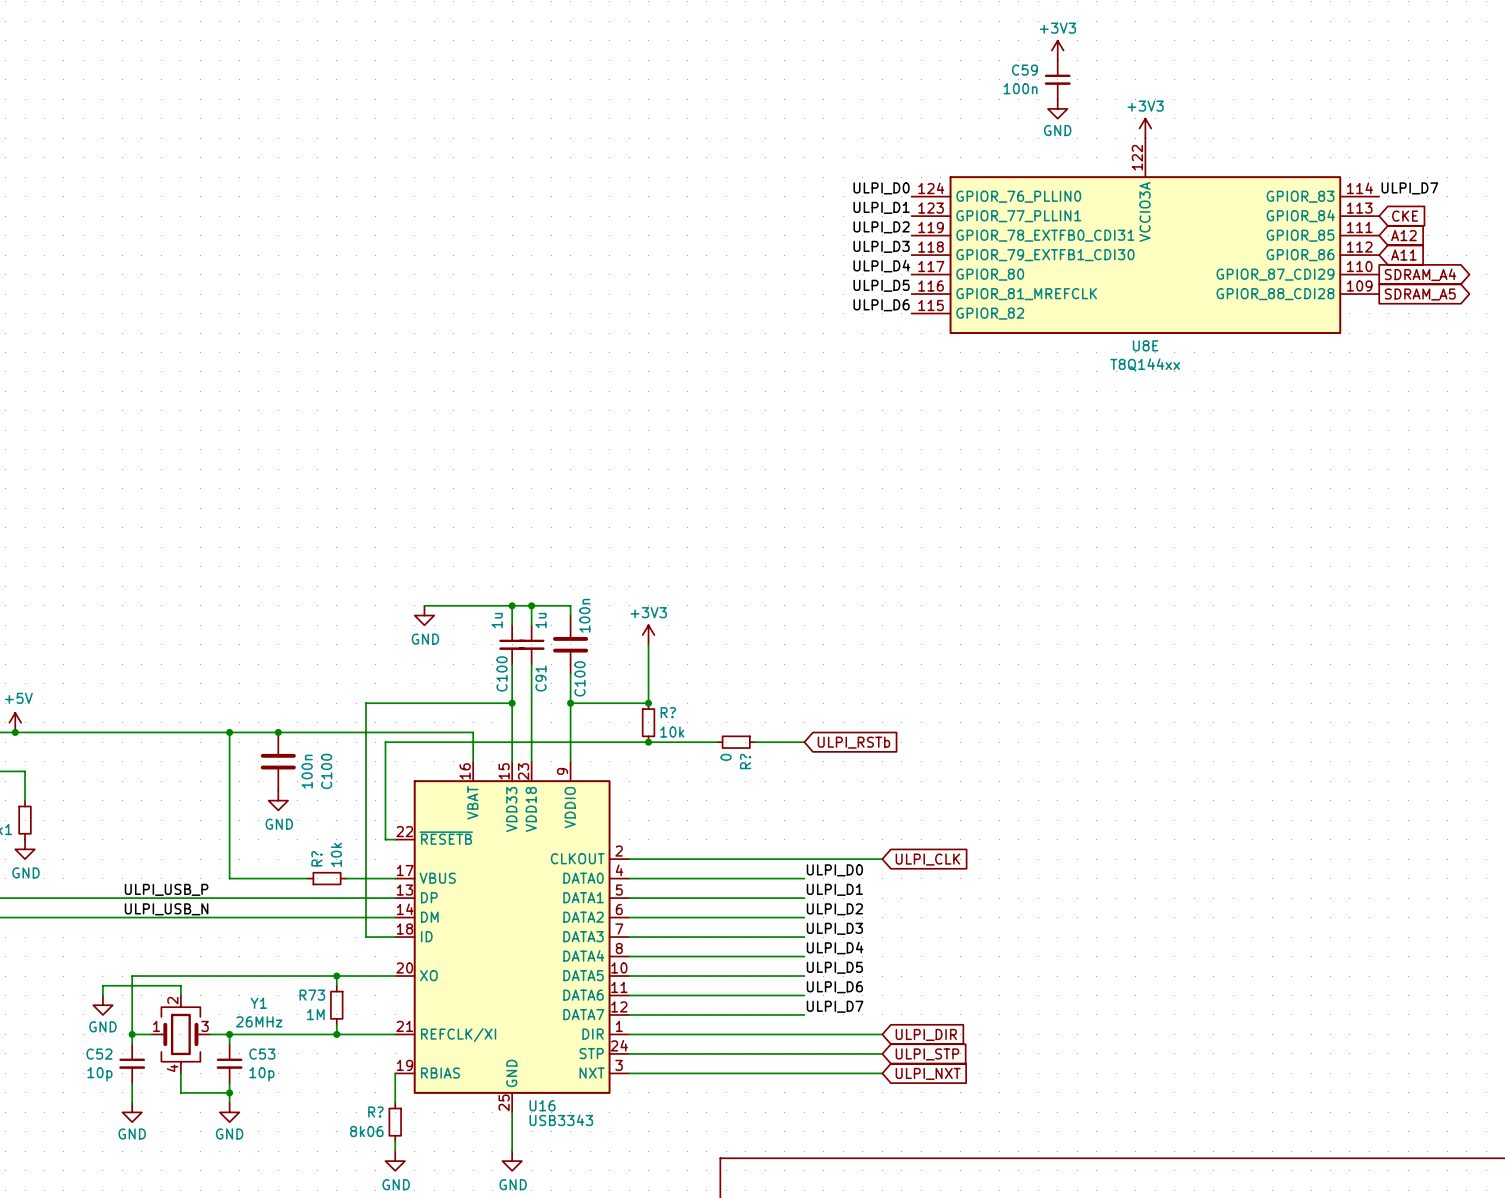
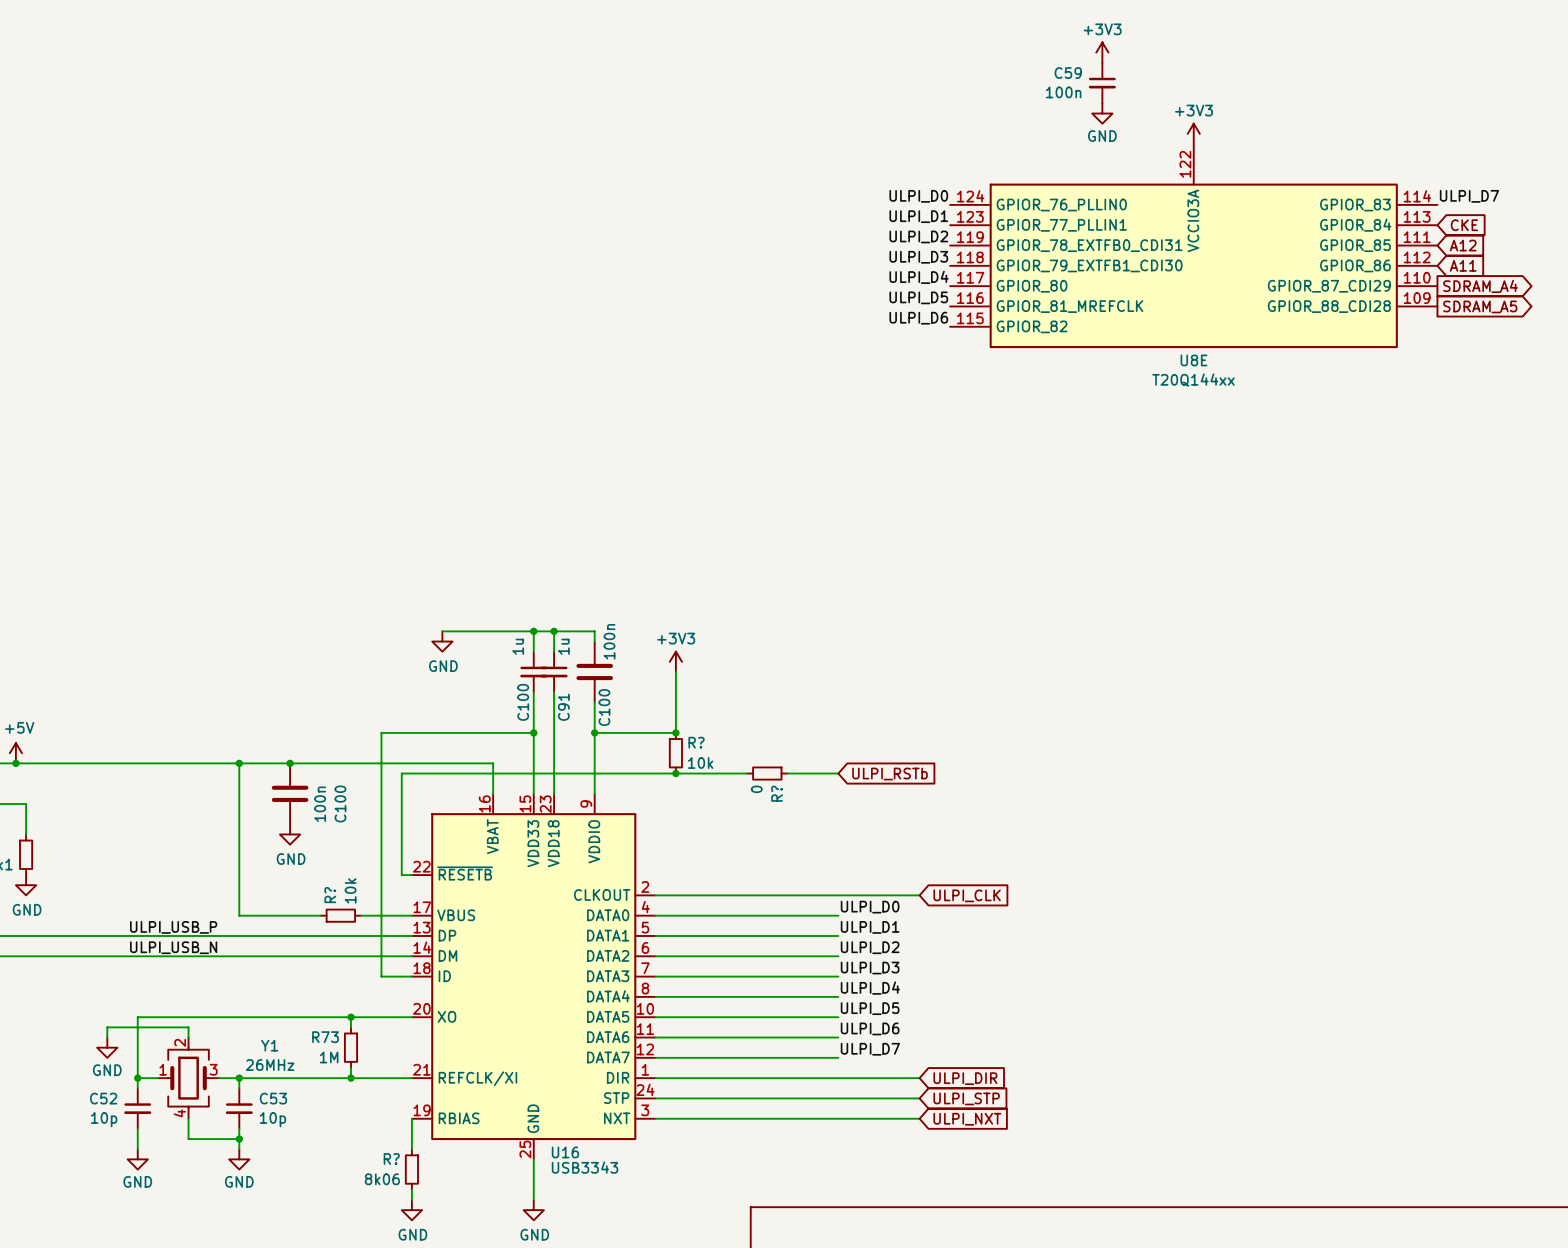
U8E value: T8Q144xx (1145, 364) -> T20Q144xx (1193, 380)

